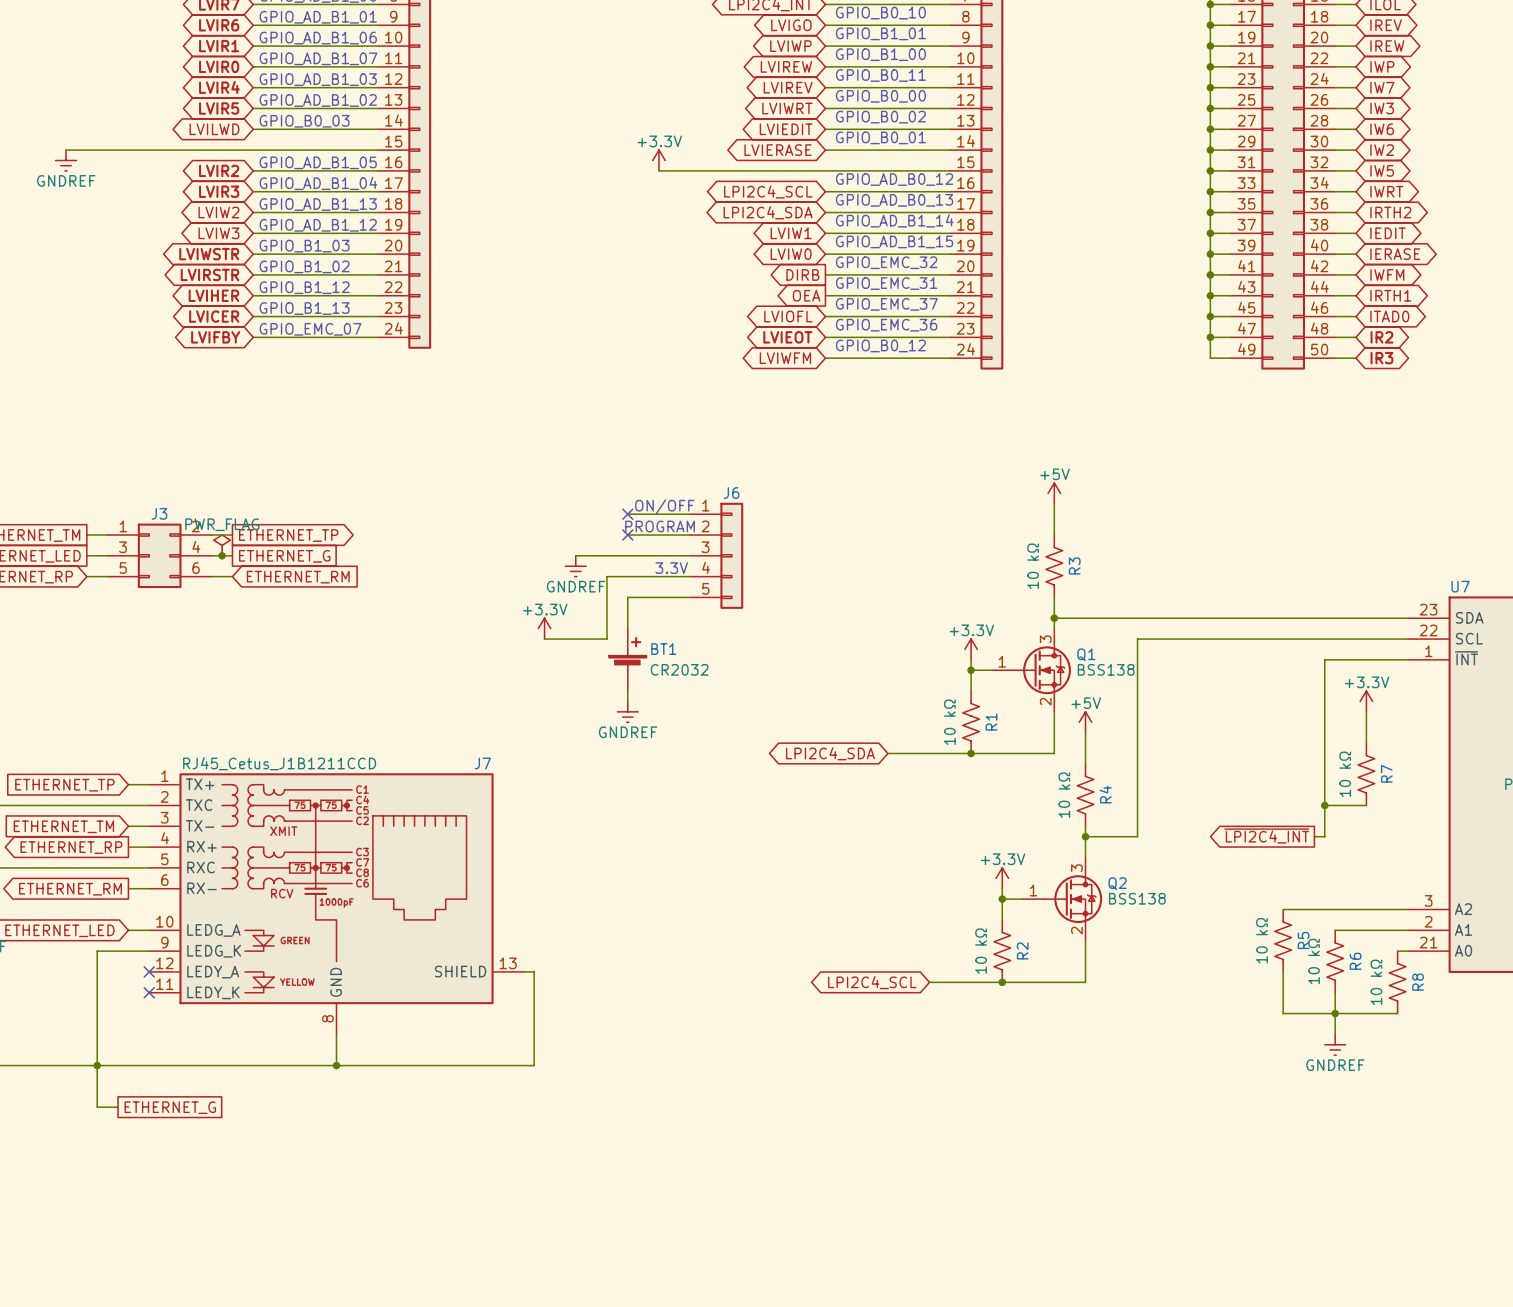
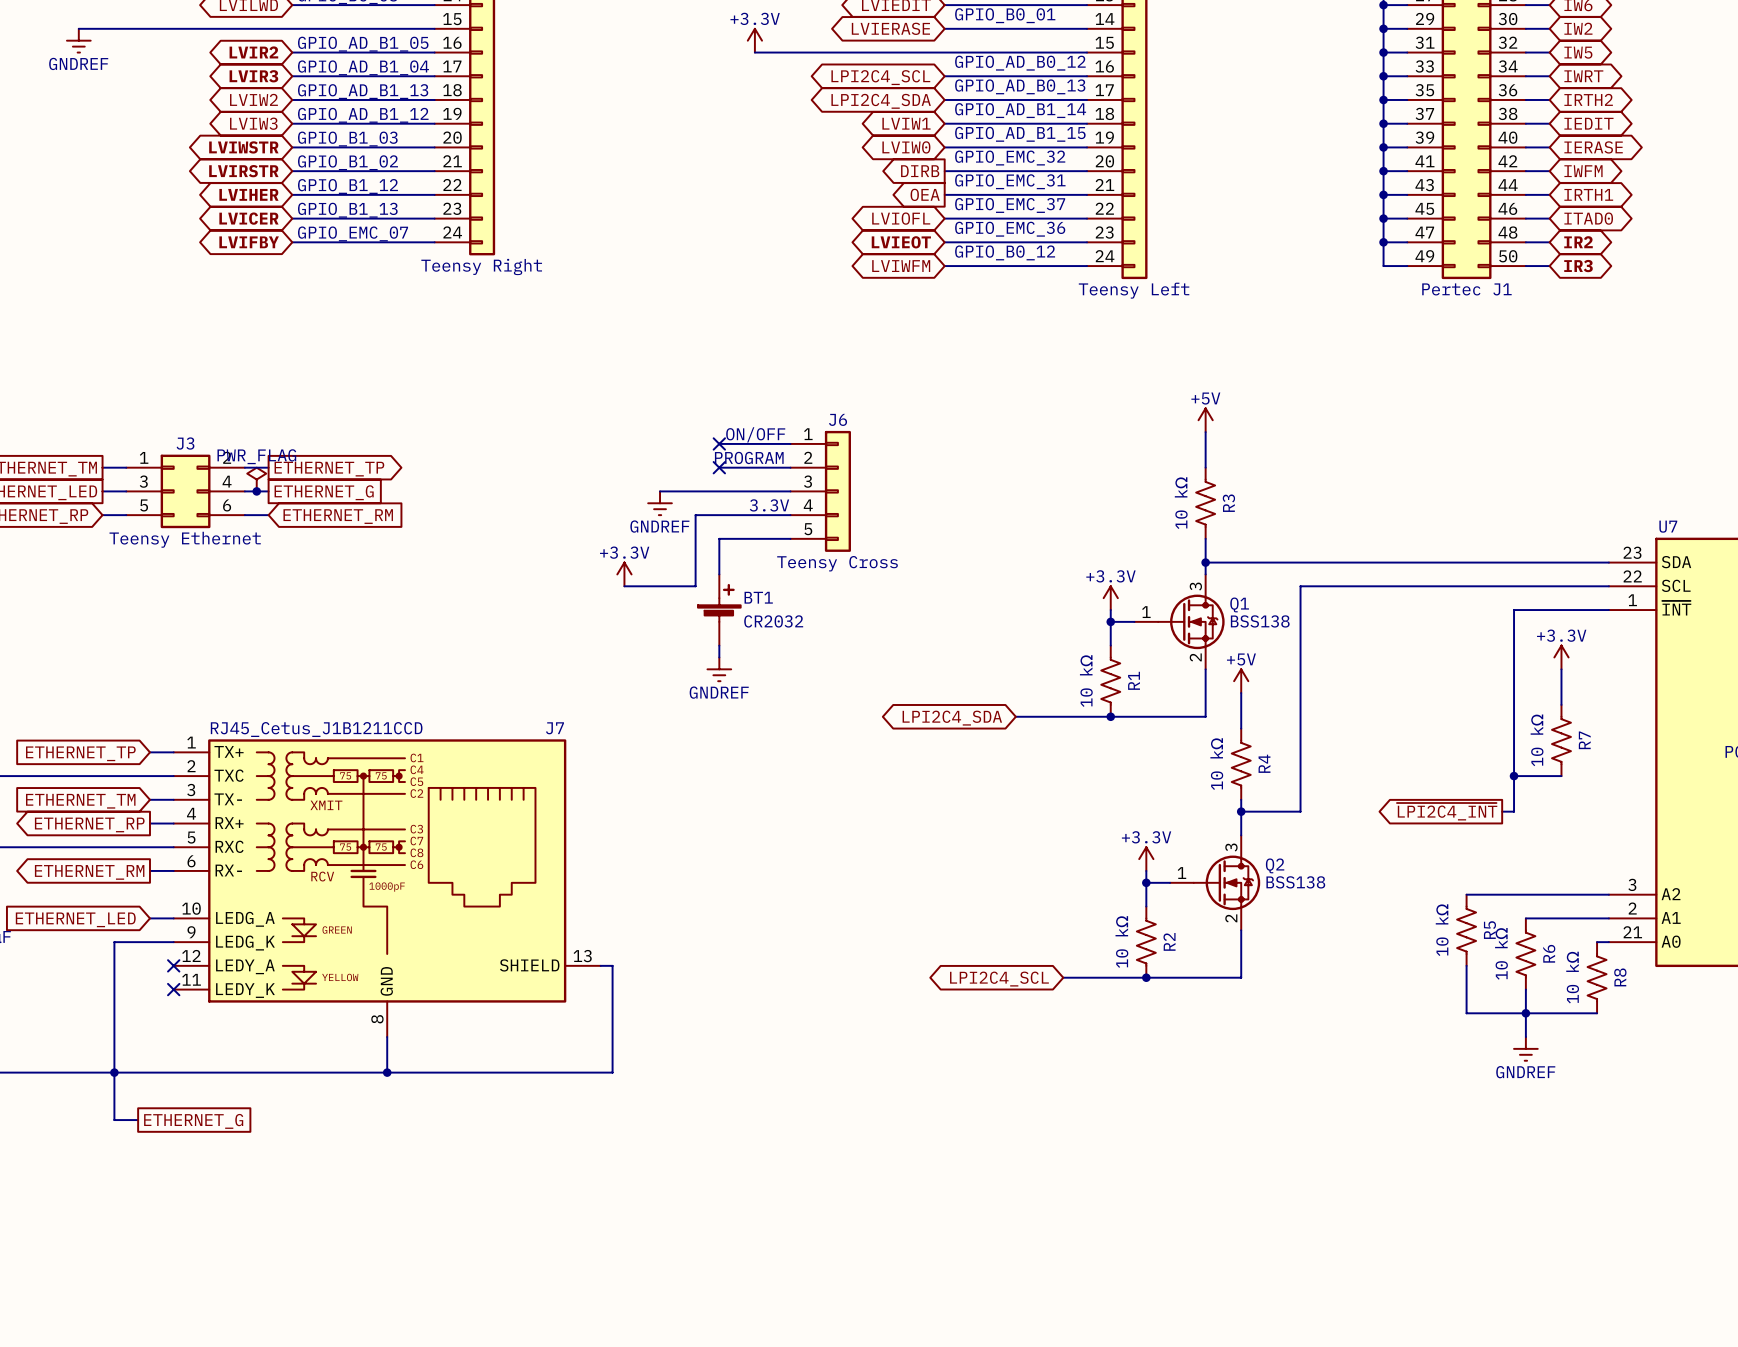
part value: none -> Teensy Right (481, 266)
part value: none -> Pertec J1 (1466, 289)
part value: none -> Teensy Left (1134, 290)
J3 value: none -> Teensy Ethernet (185, 539)
J6 value: none -> Teensy Cross (837, 563)

